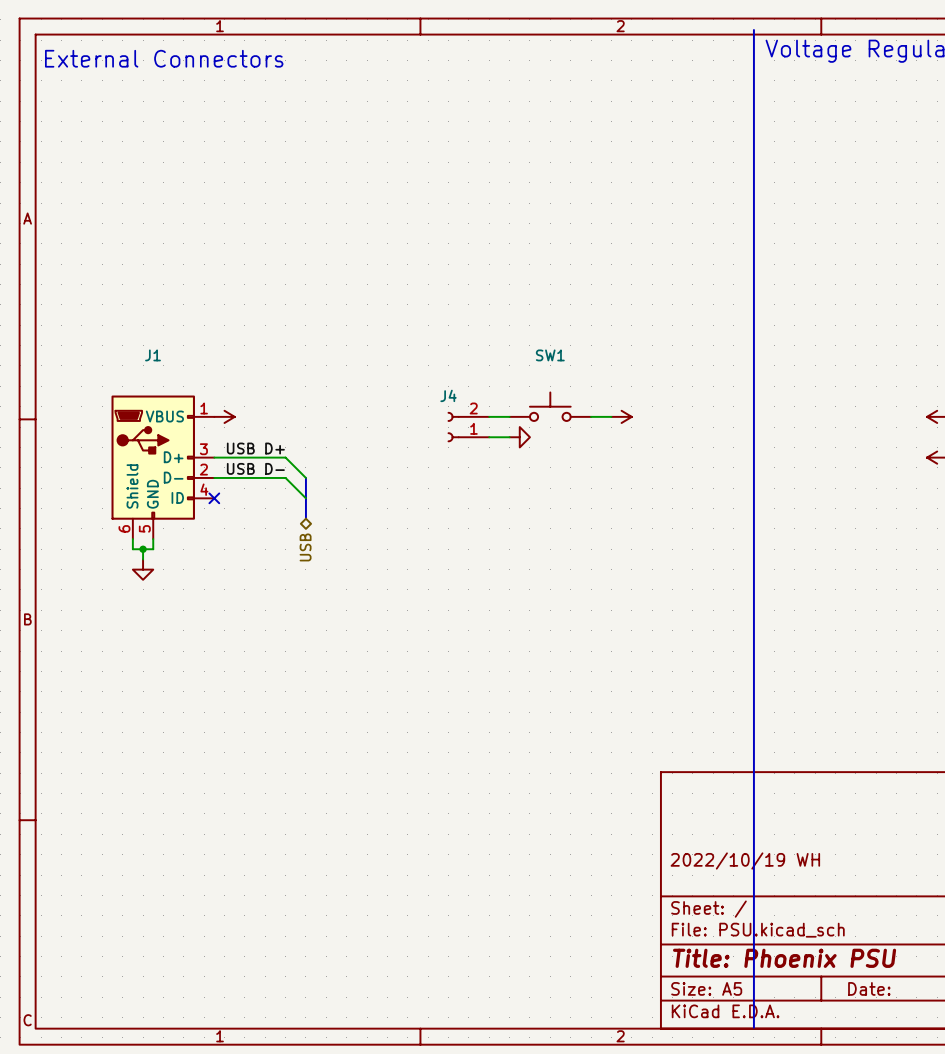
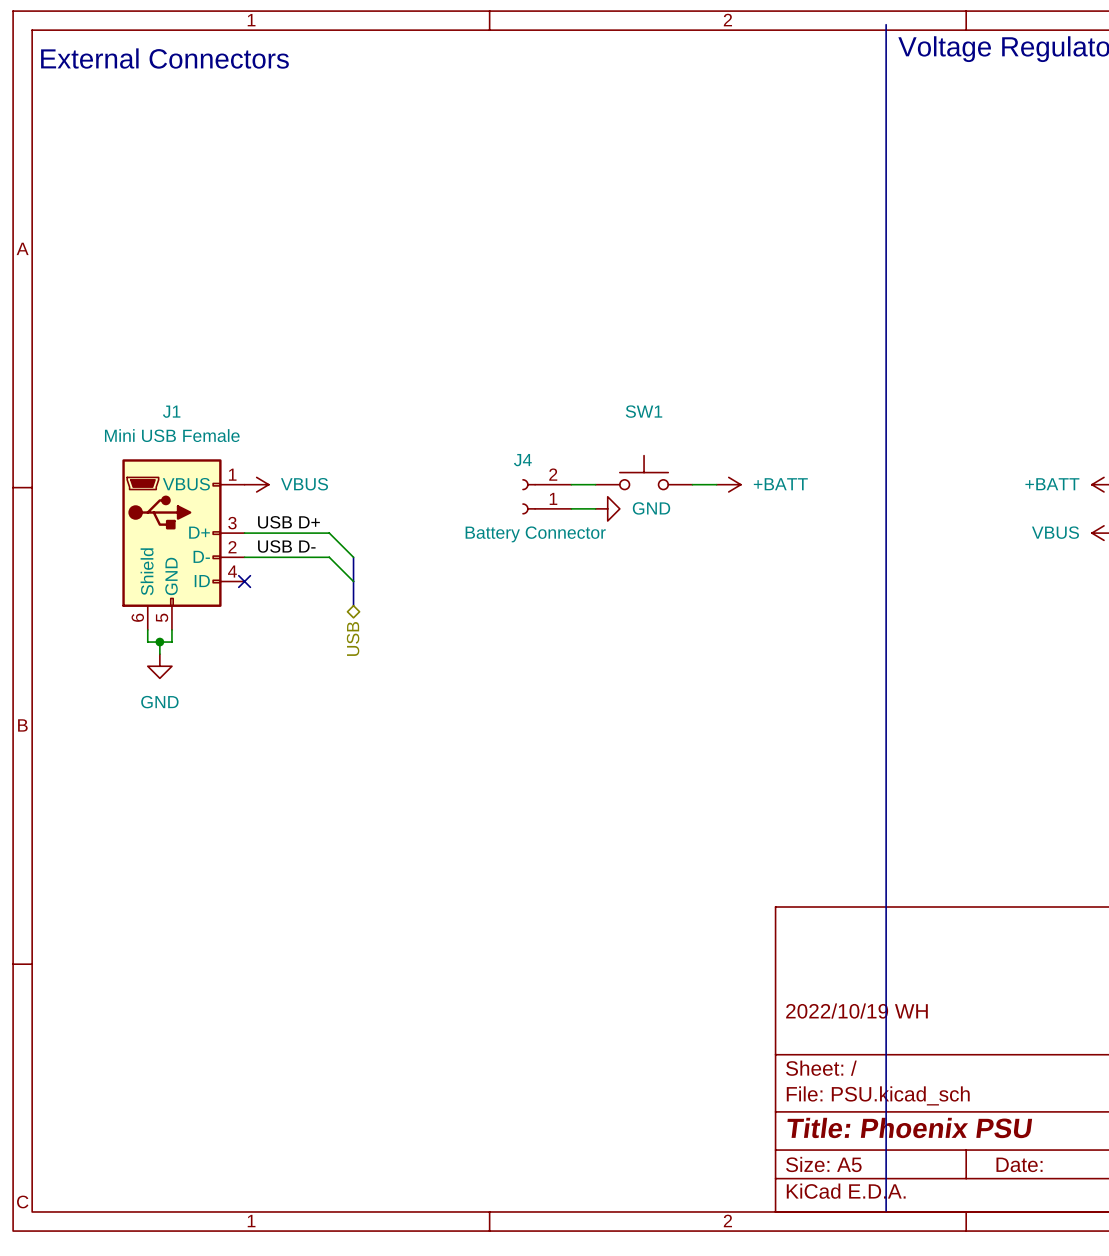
J1 value: none -> Mini USB Female (172, 435)
power symbol text: none -> VBUS (304, 484)
power symbol text: none -> +BATT (780, 484)
power symbol text: none -> +BATT (1052, 484)
power symbol text: none -> GND (651, 508)
power symbol text: none -> VBUS (1055, 532)
J4 value: none -> Battery Connector (535, 534)
power symbol text: none -> GND (159, 702)

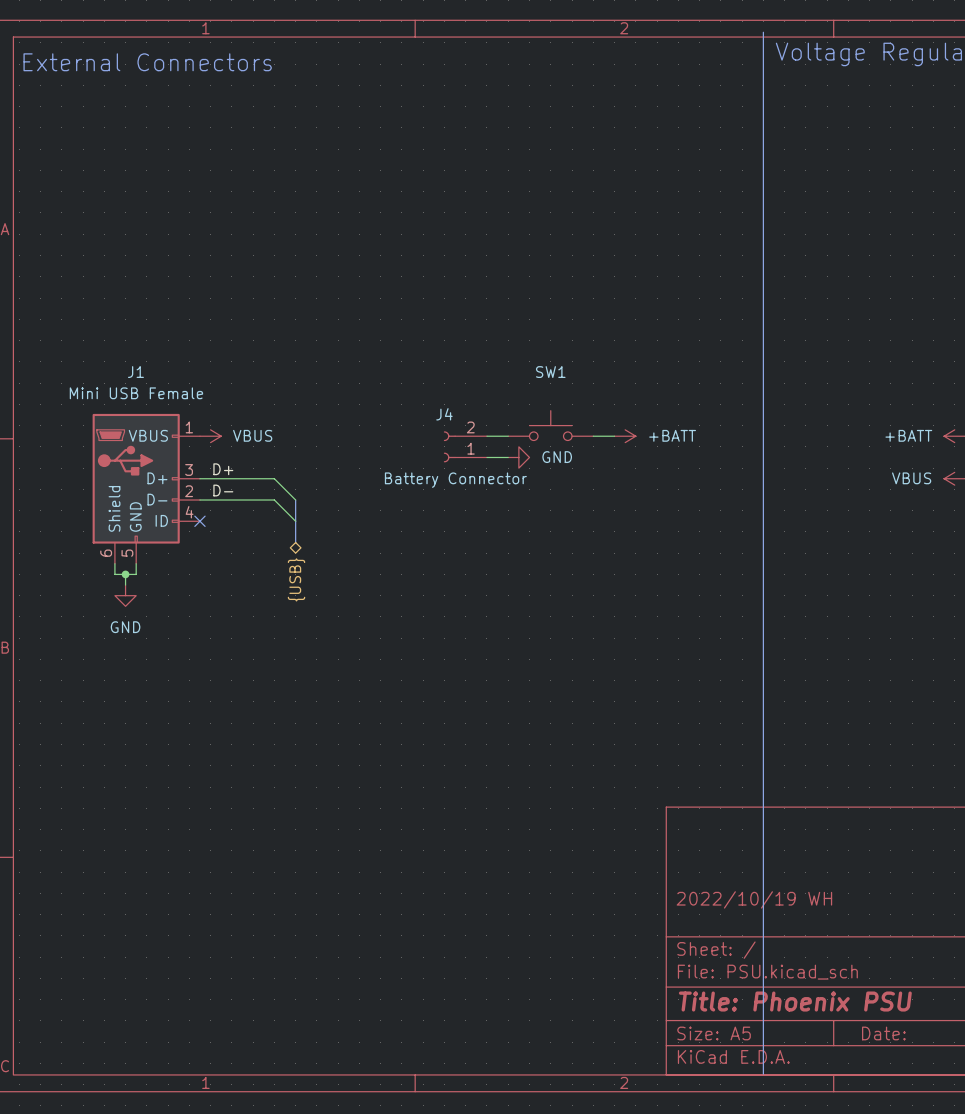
label: USB D+ (288, 522) -> D+ (223, 469)
label: USB D- (286, 546) -> D- (223, 490)
hierarchical label: USB (353, 638) -> {USB} (296, 579)

